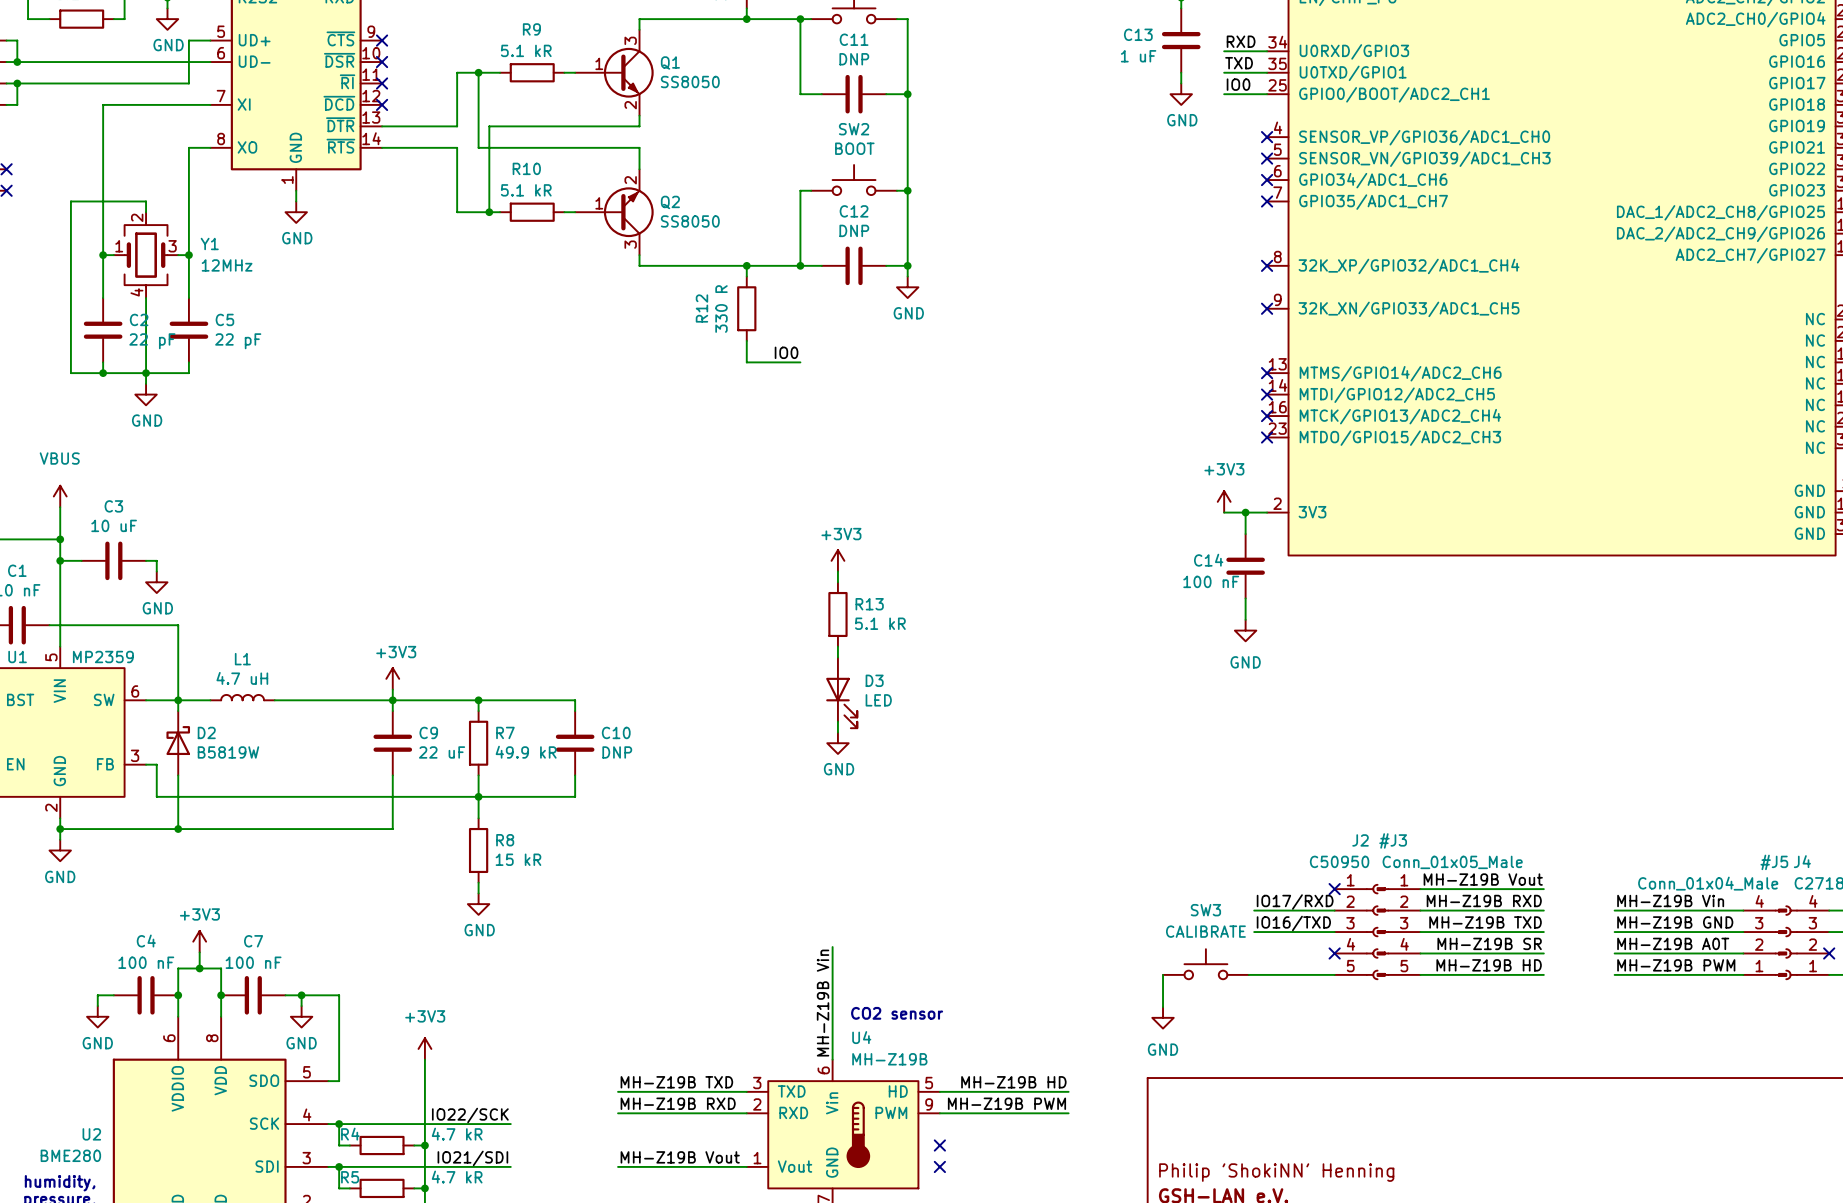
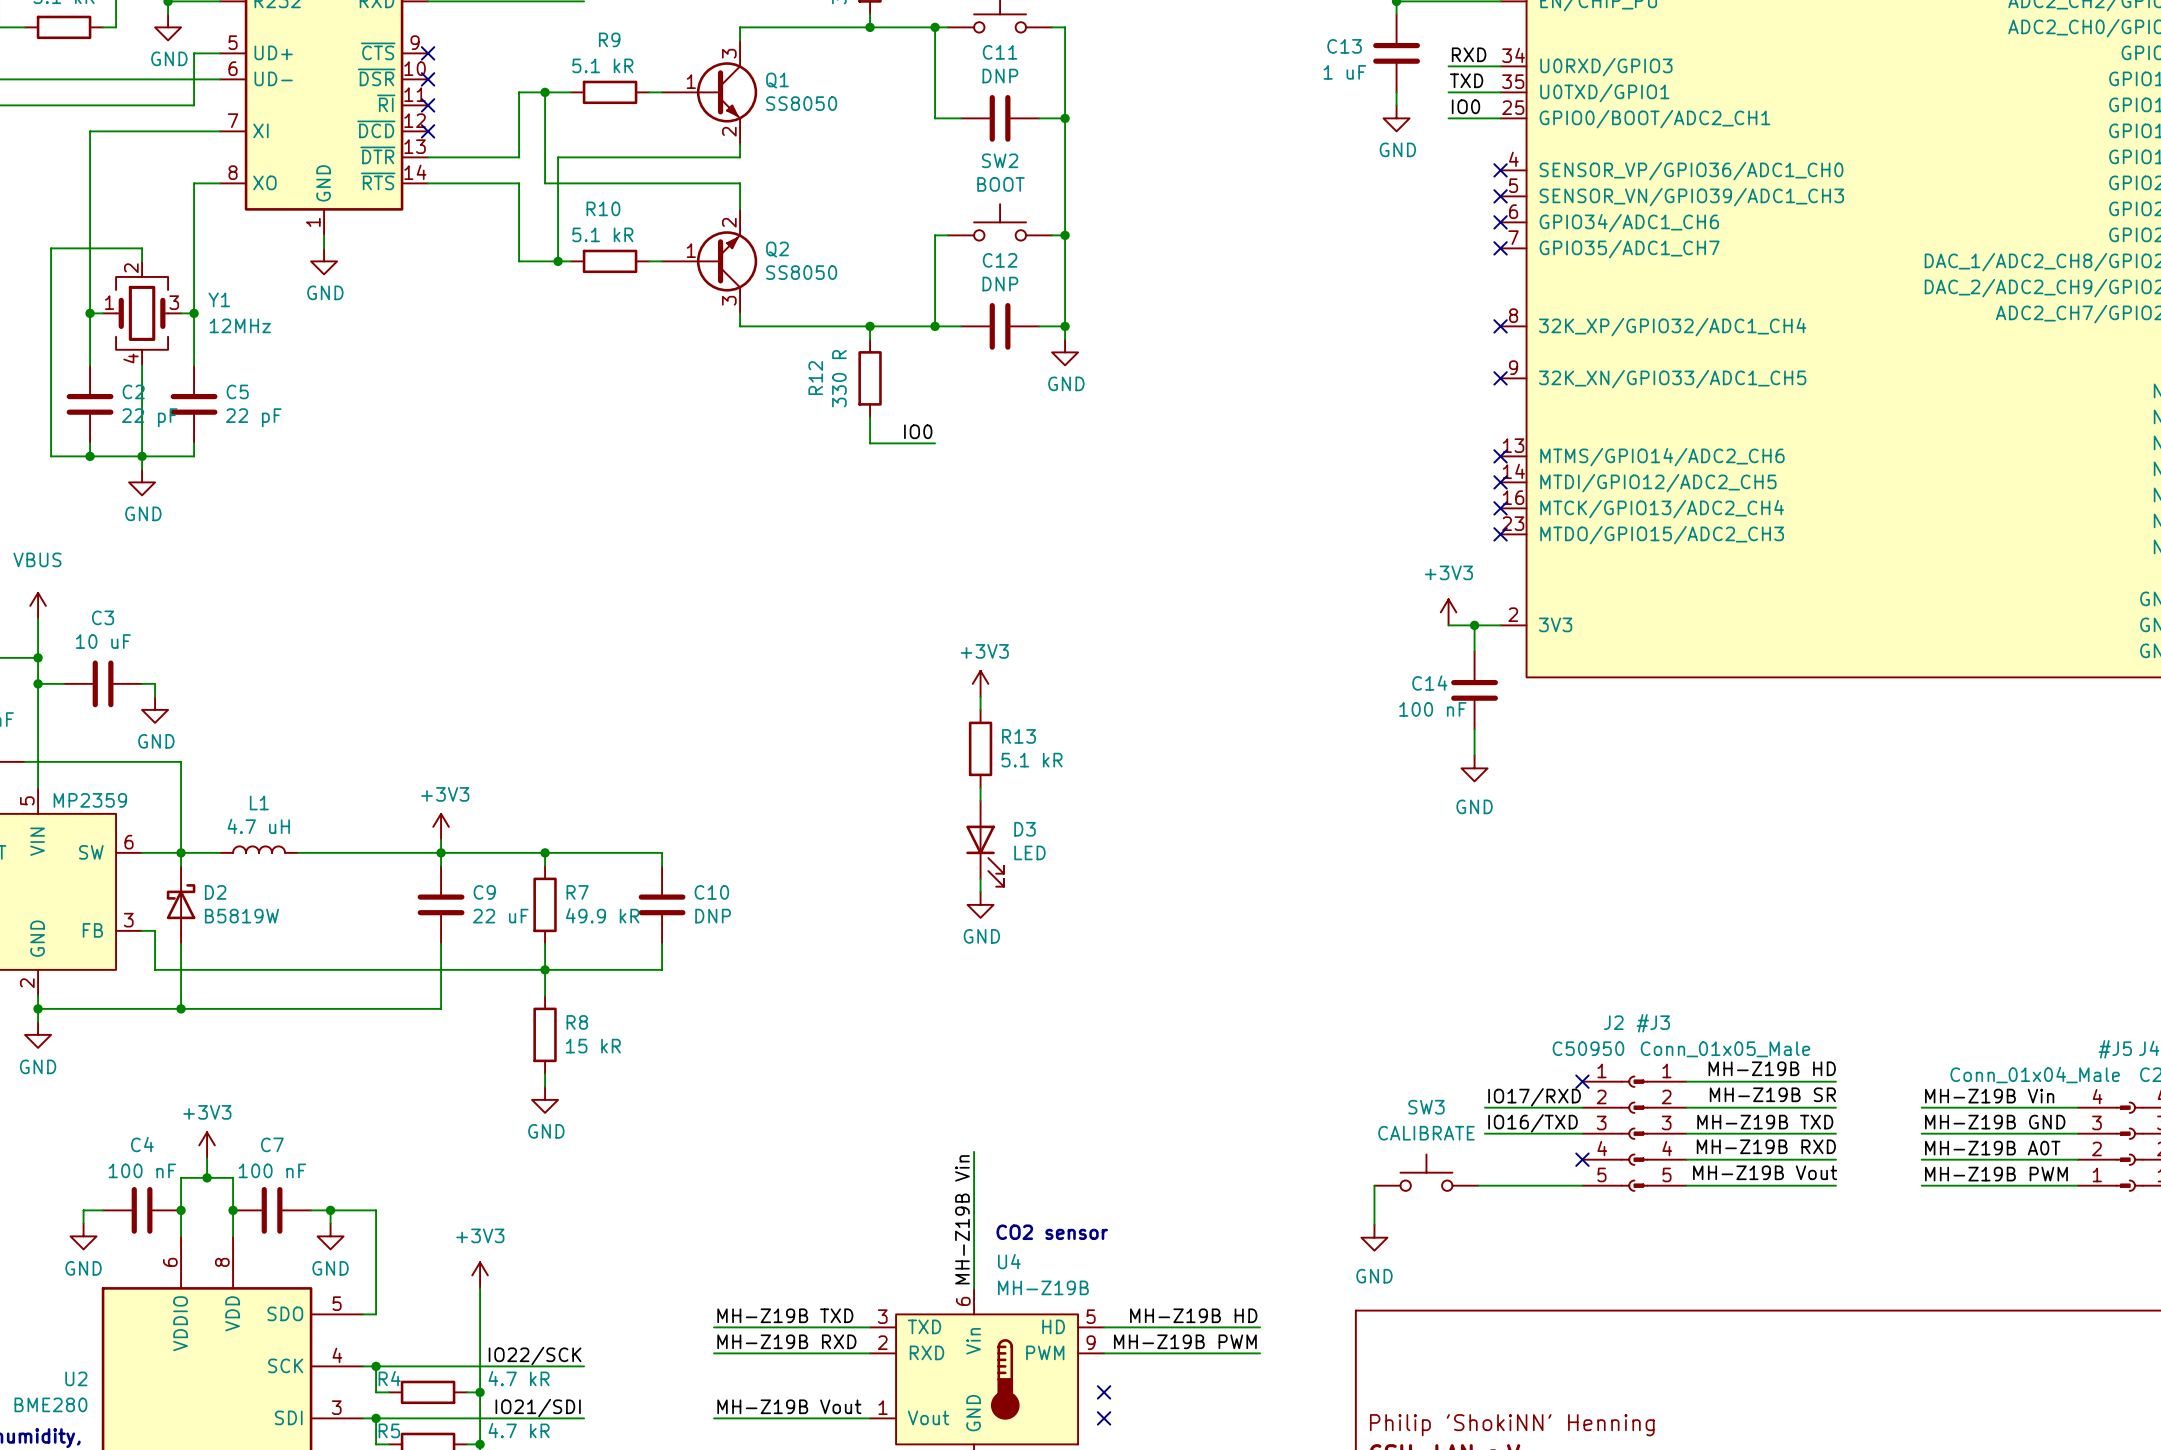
label position: MH-Z19B Vout (1483, 879) -> MH-Z19B Vout (1765, 1172)
label position: MH-Z19B RXD (1484, 900) -> MH-Z19B RXD (1766, 1146)
label position: MH-Z19B SR (1489, 943) -> MH-Z19B SR (1772, 1094)
label position: MH-Z19B HD (1489, 965) -> MH-Z19B HD (1772, 1068)

